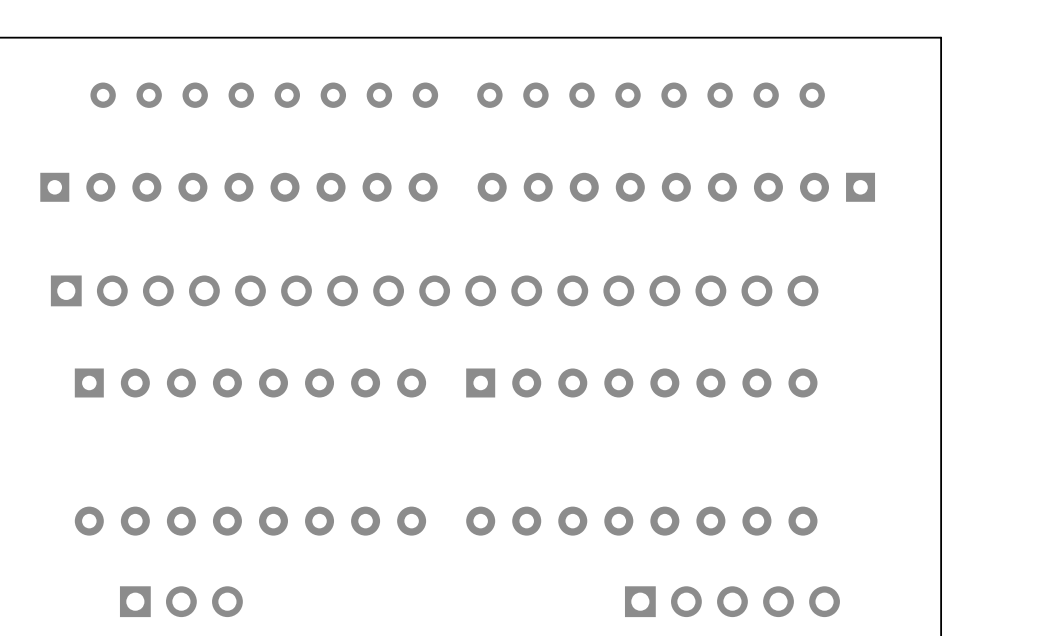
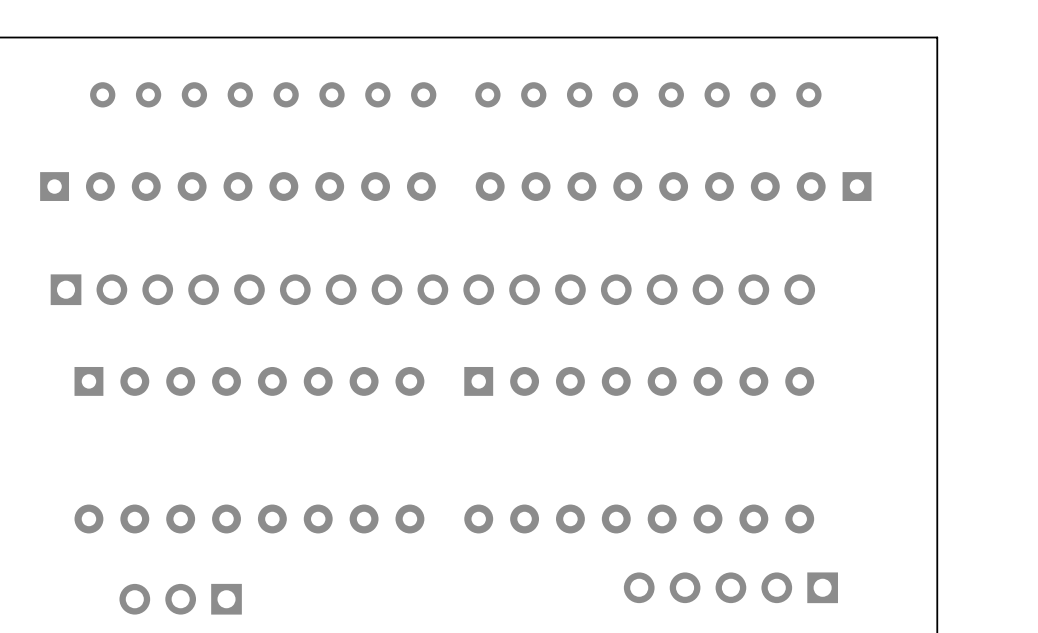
part rotation: 0° (181, 601) -> 180° (180, 599)
part rotation: 0° (732, 601) -> 180° (730, 587)

